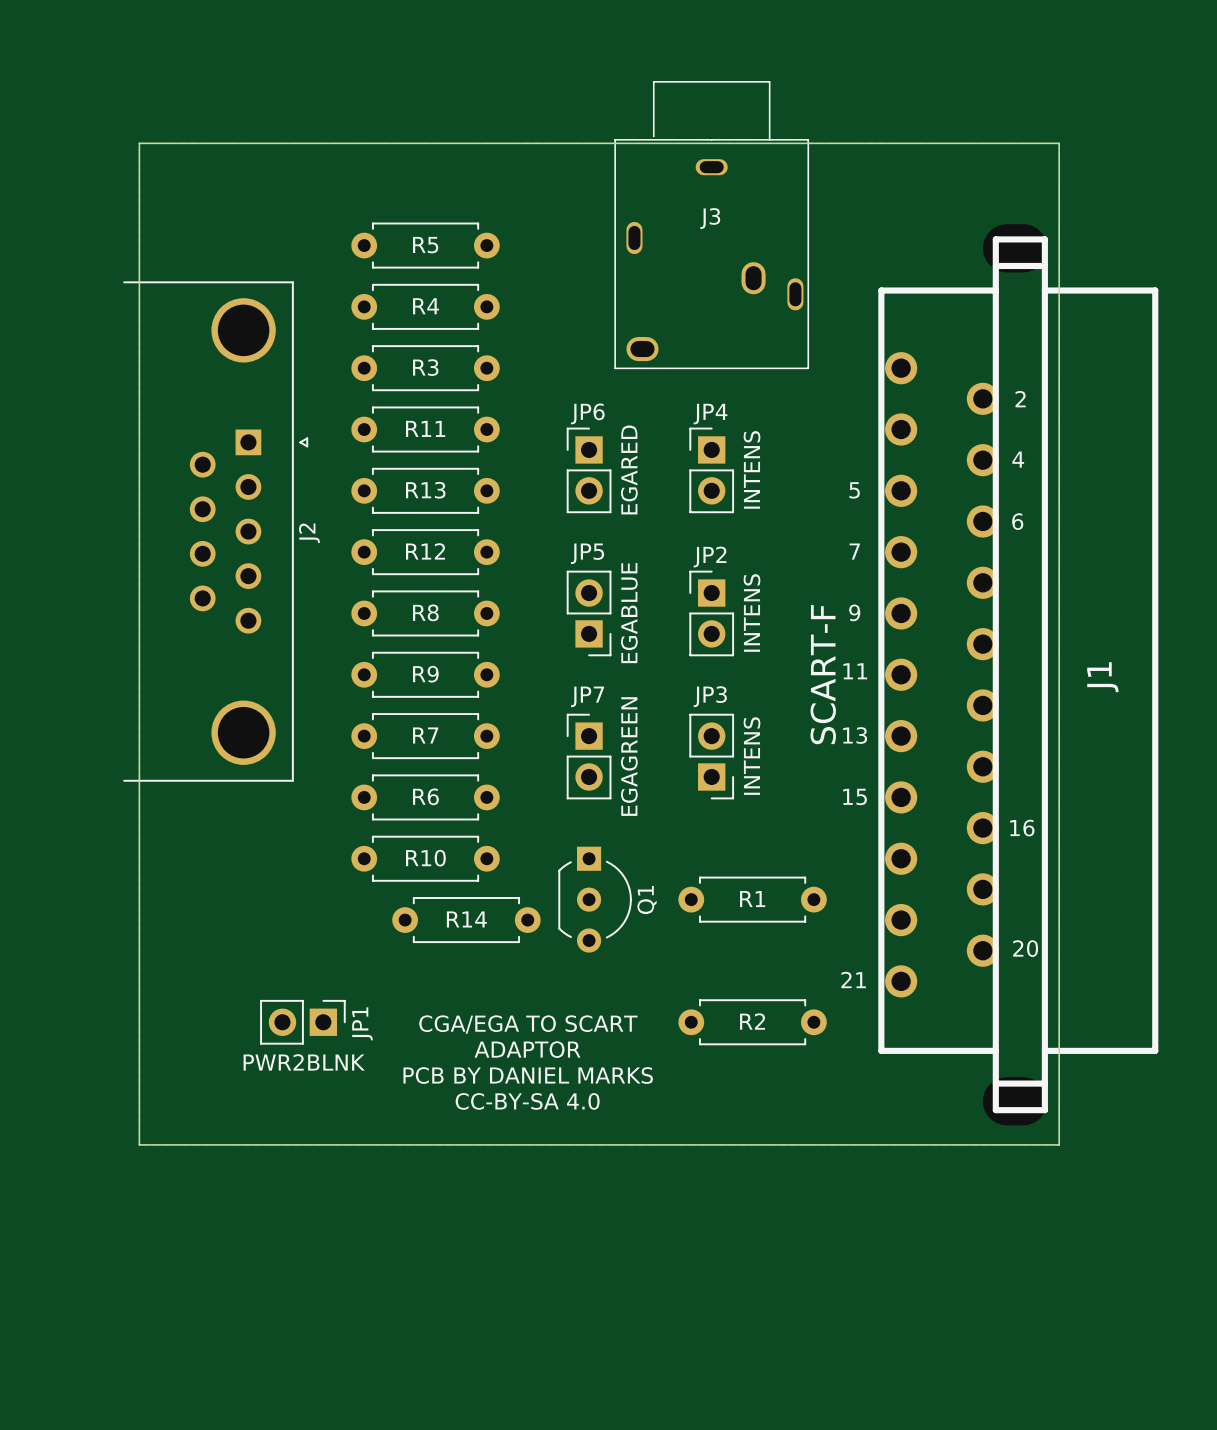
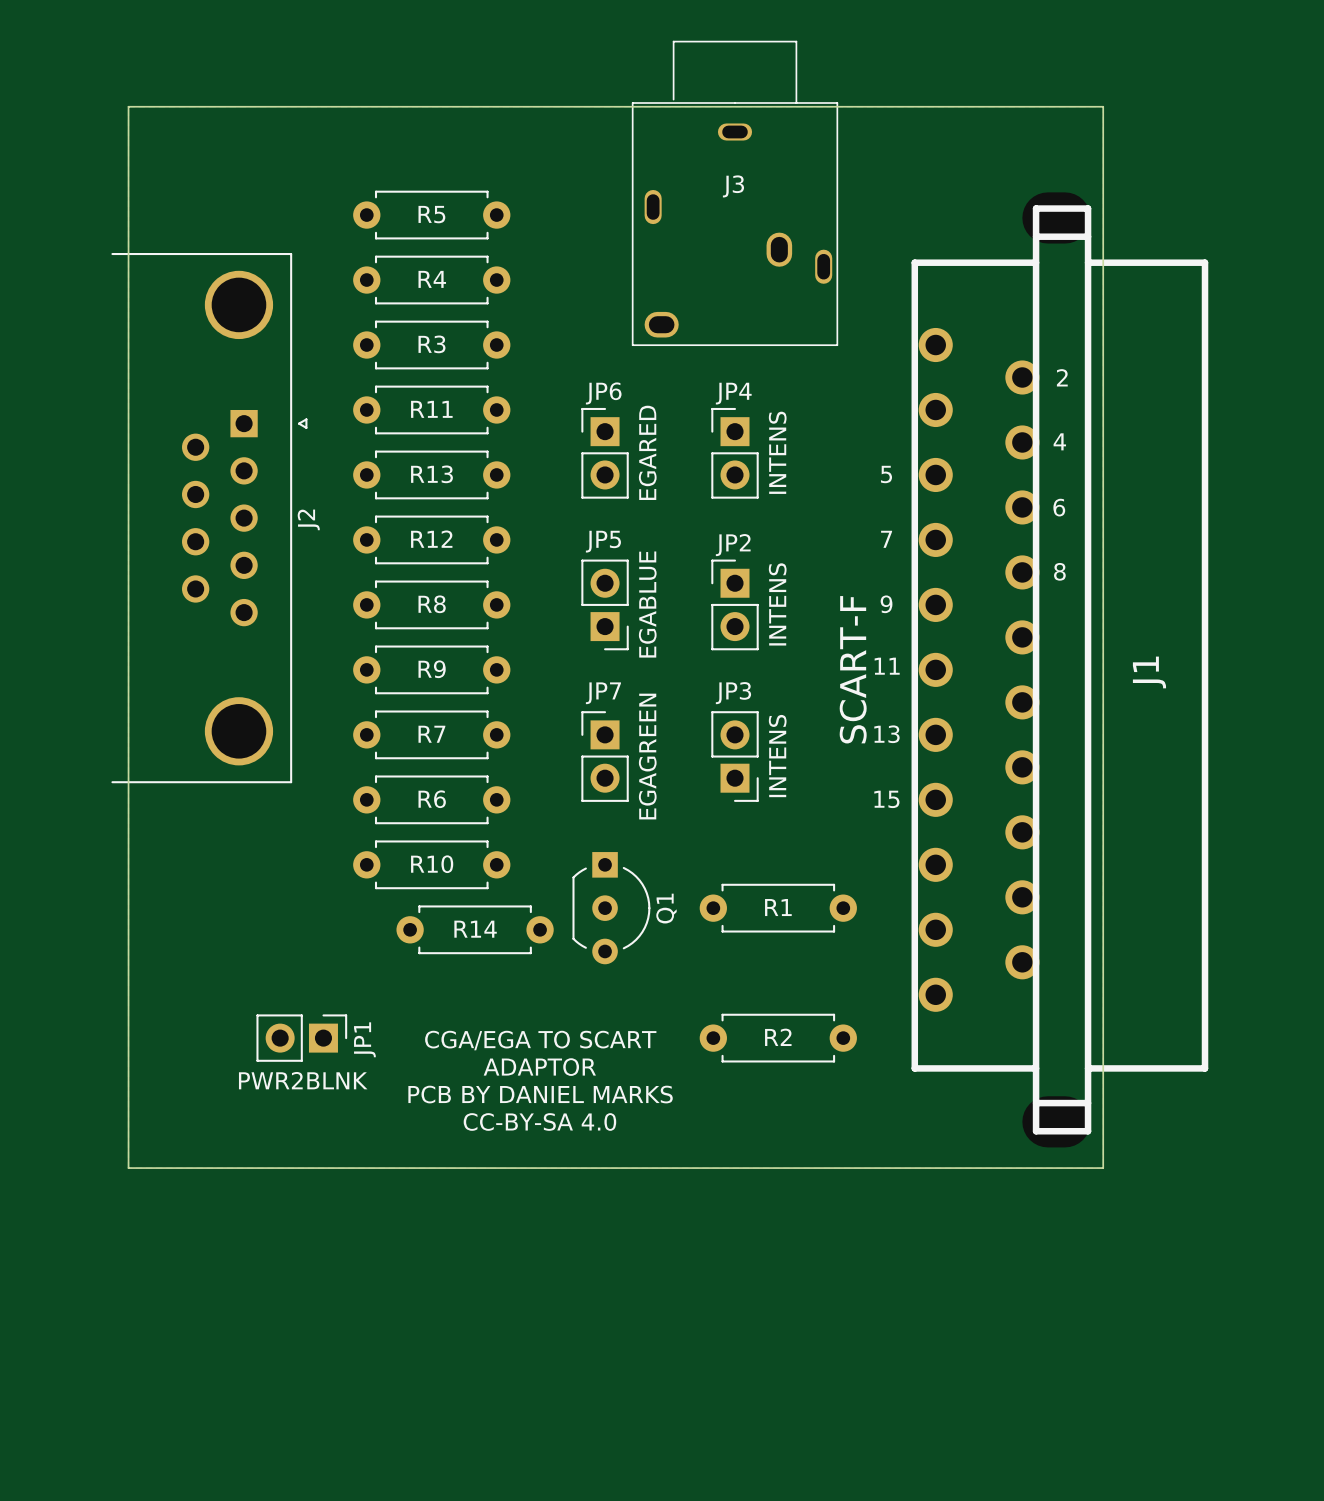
text: none -> 8 (1059, 571)
text: 16 (1022, 828) -> none
text: 20 (1025, 948) -> none
text: 21 (853, 980) -> none

